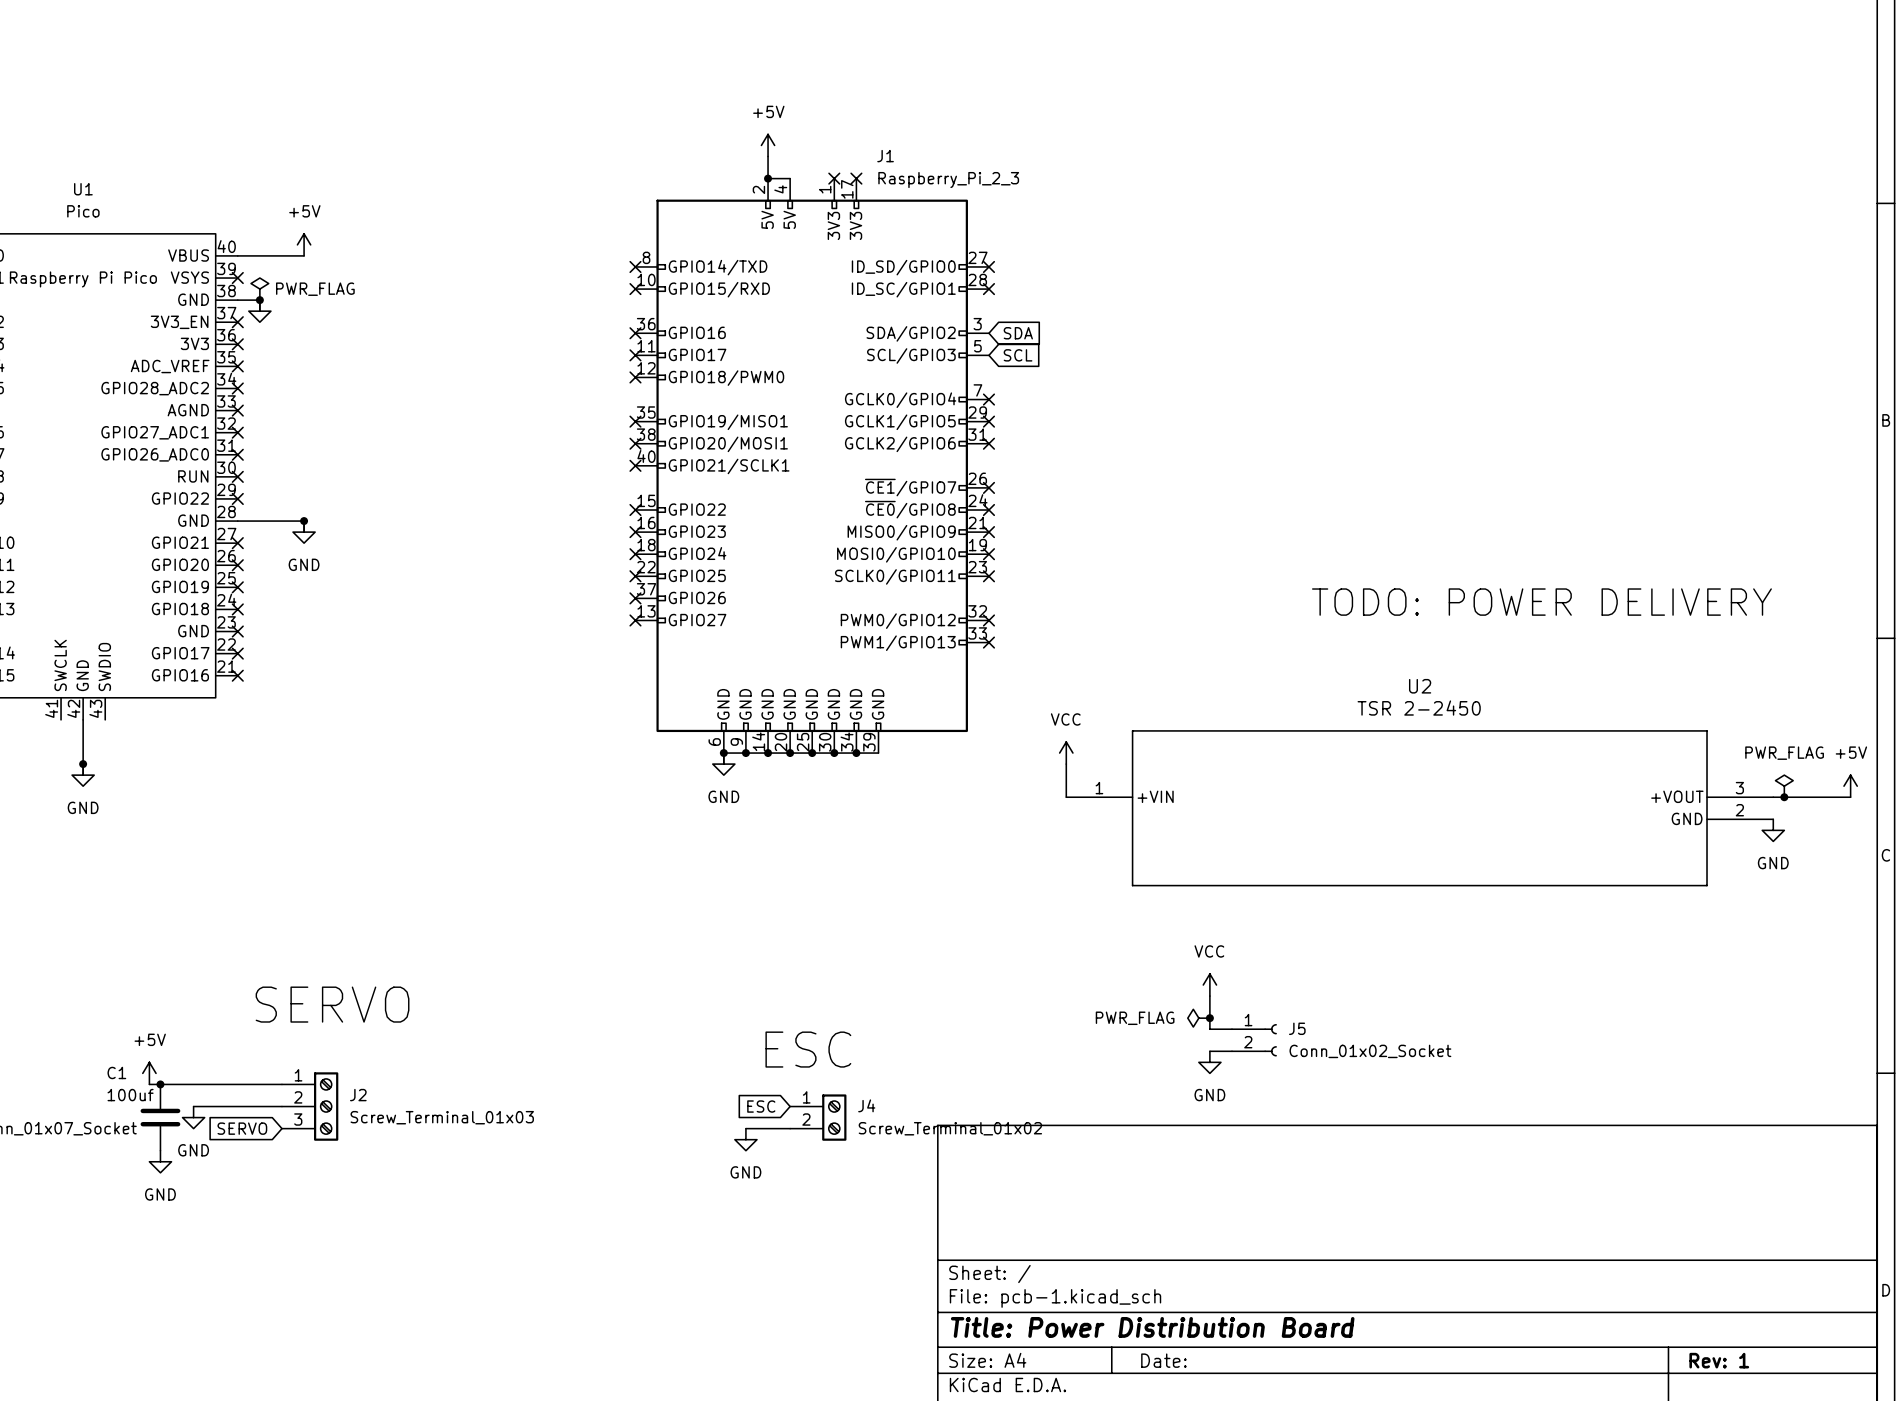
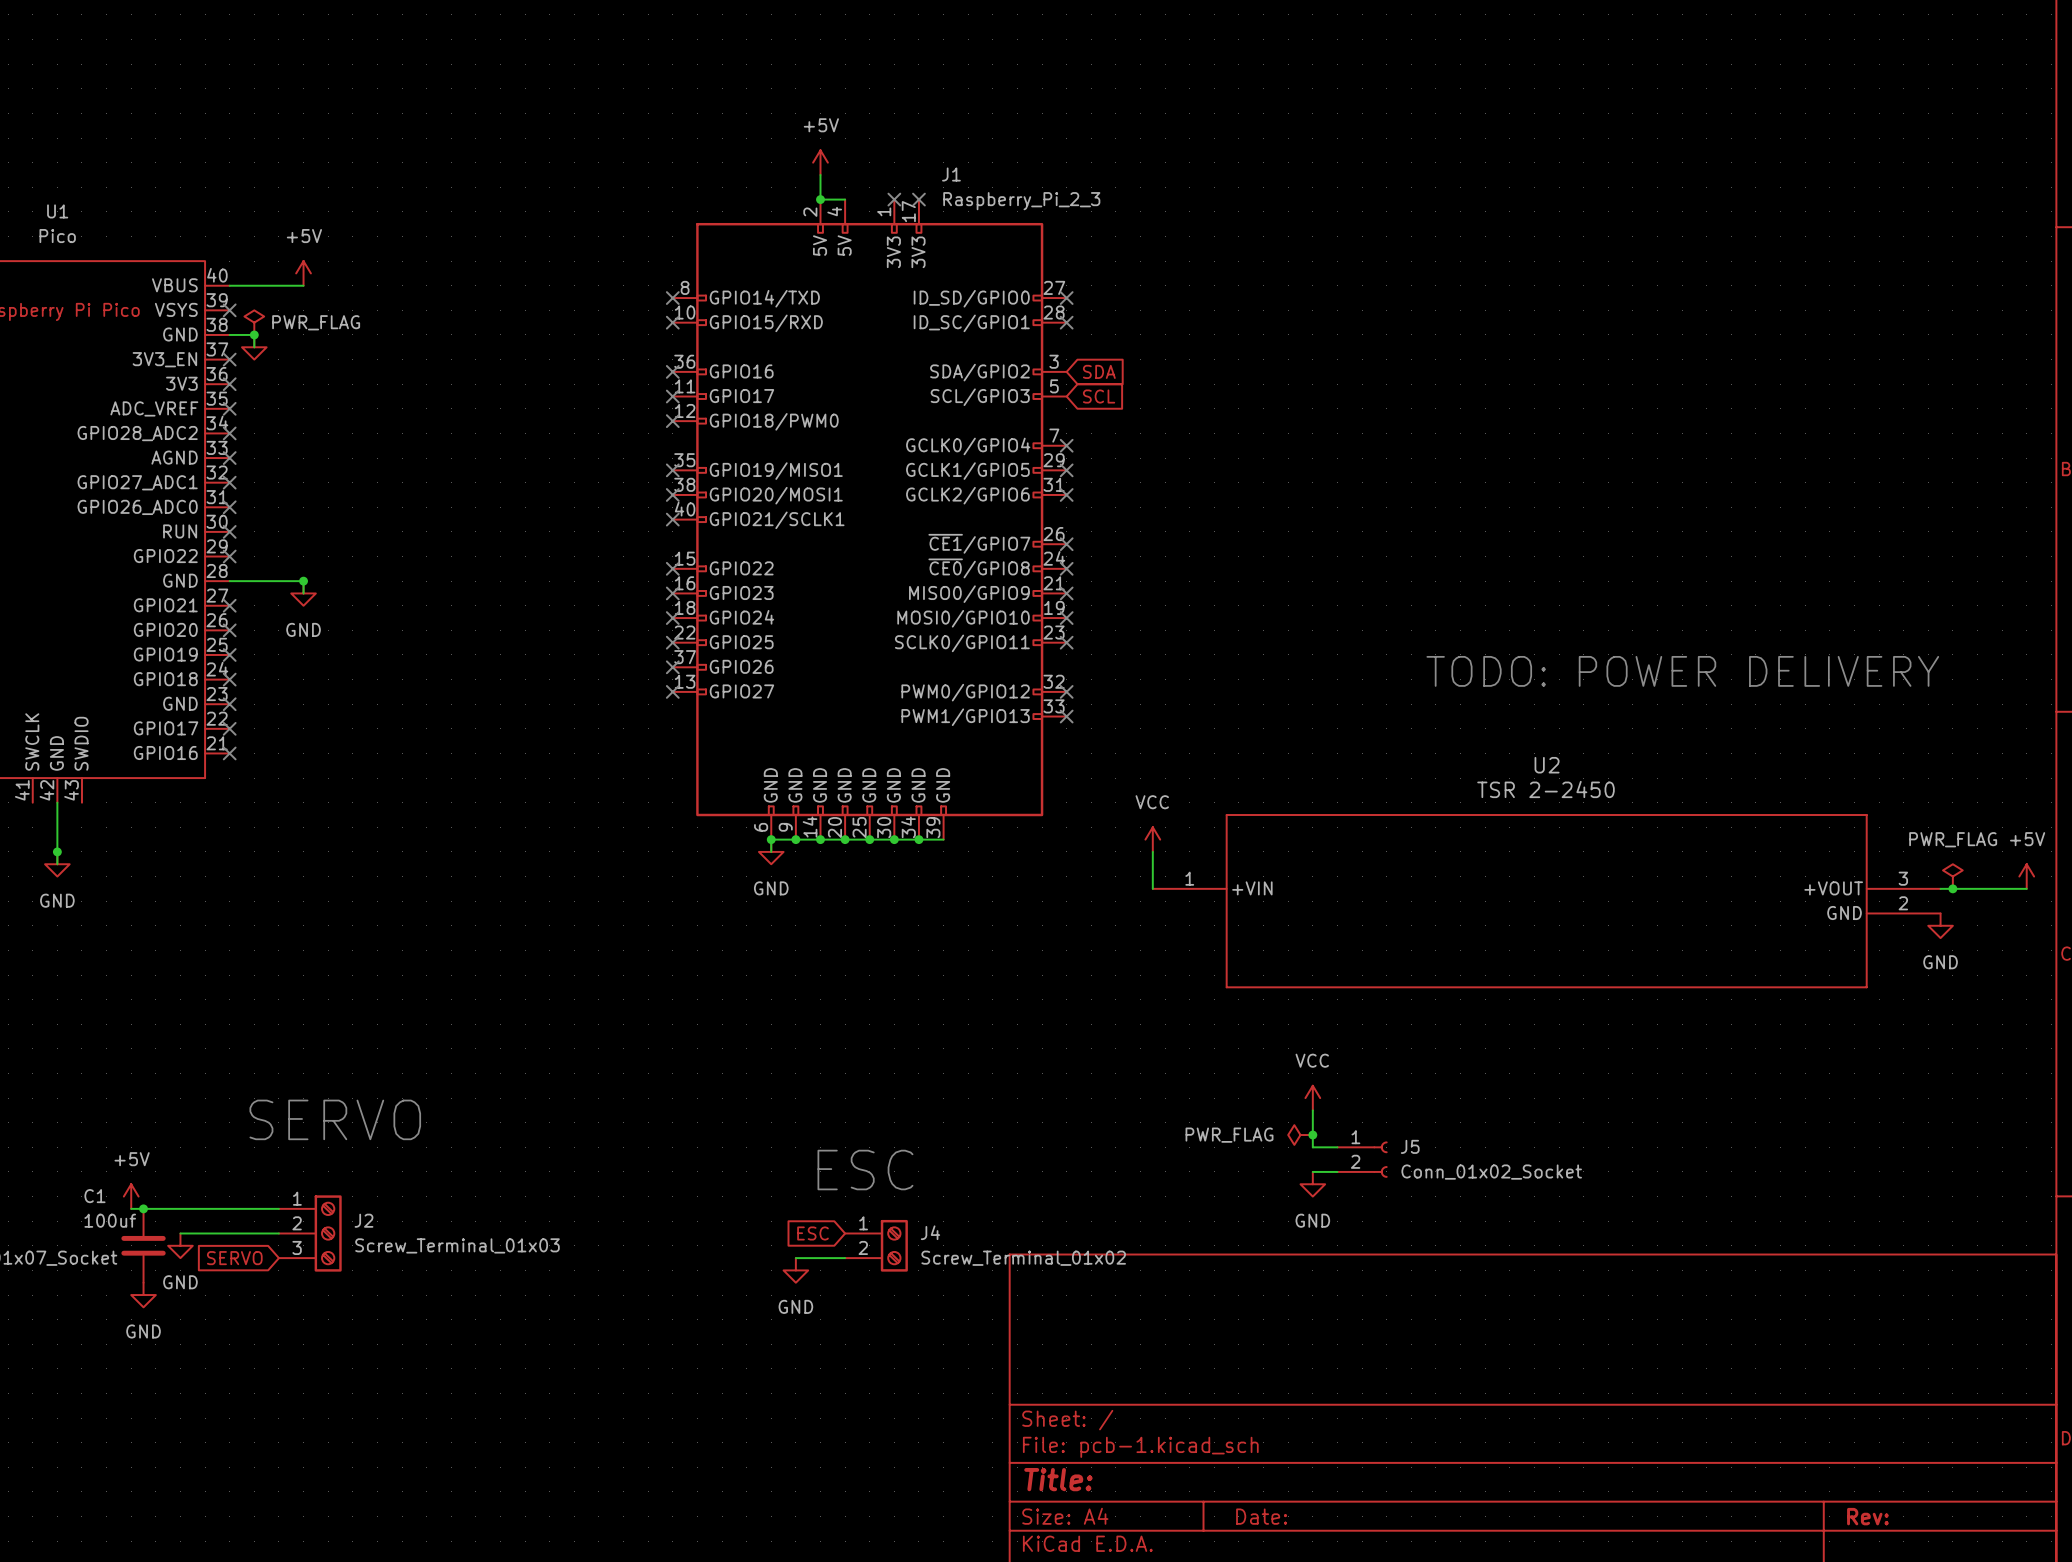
title block: Title: Power Distribution Board (1152, 1327) -> Title: (1058, 1479)
title block: Rev: 1 (1719, 1360) -> Rev: (1867, 1516)

